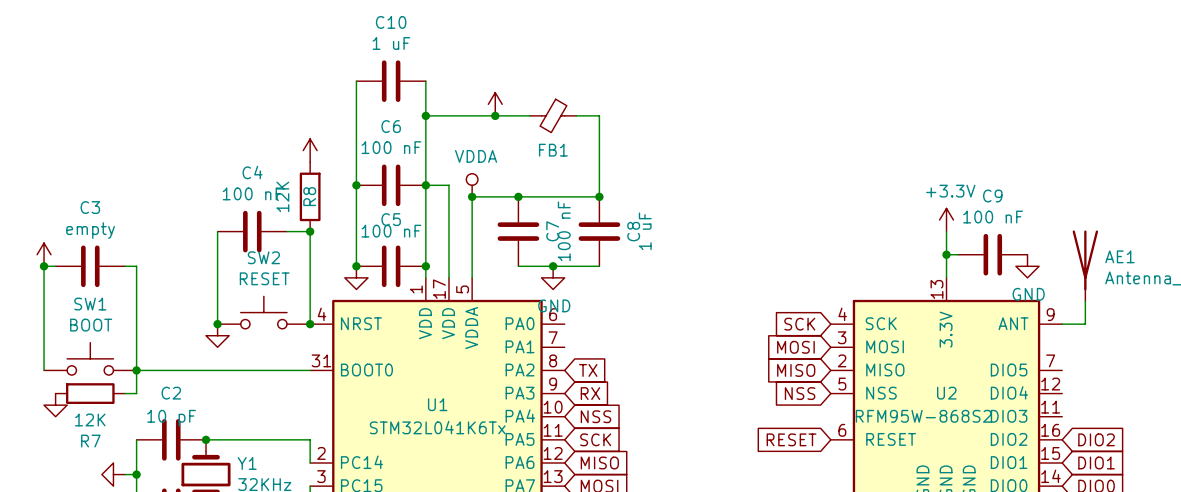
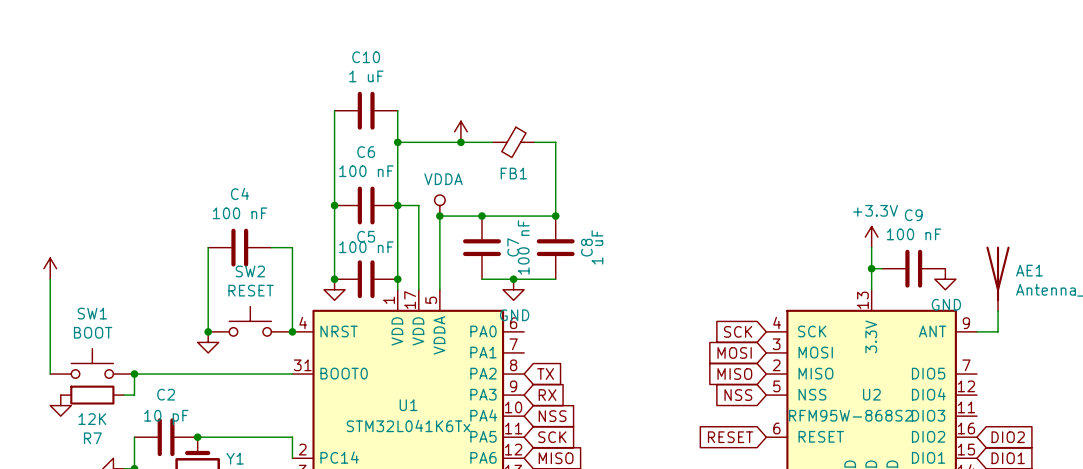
power symbol: (310, 150) -> none
R8: 12K (310, 196) -> none
junction: (310, 231) -> none
wire: (44, 266) (55, 266) -> none
junction: (44, 266) -> none
C3: empty (90, 266) -> none
wire: (125, 266) (136, 266) (136, 370) -> none

